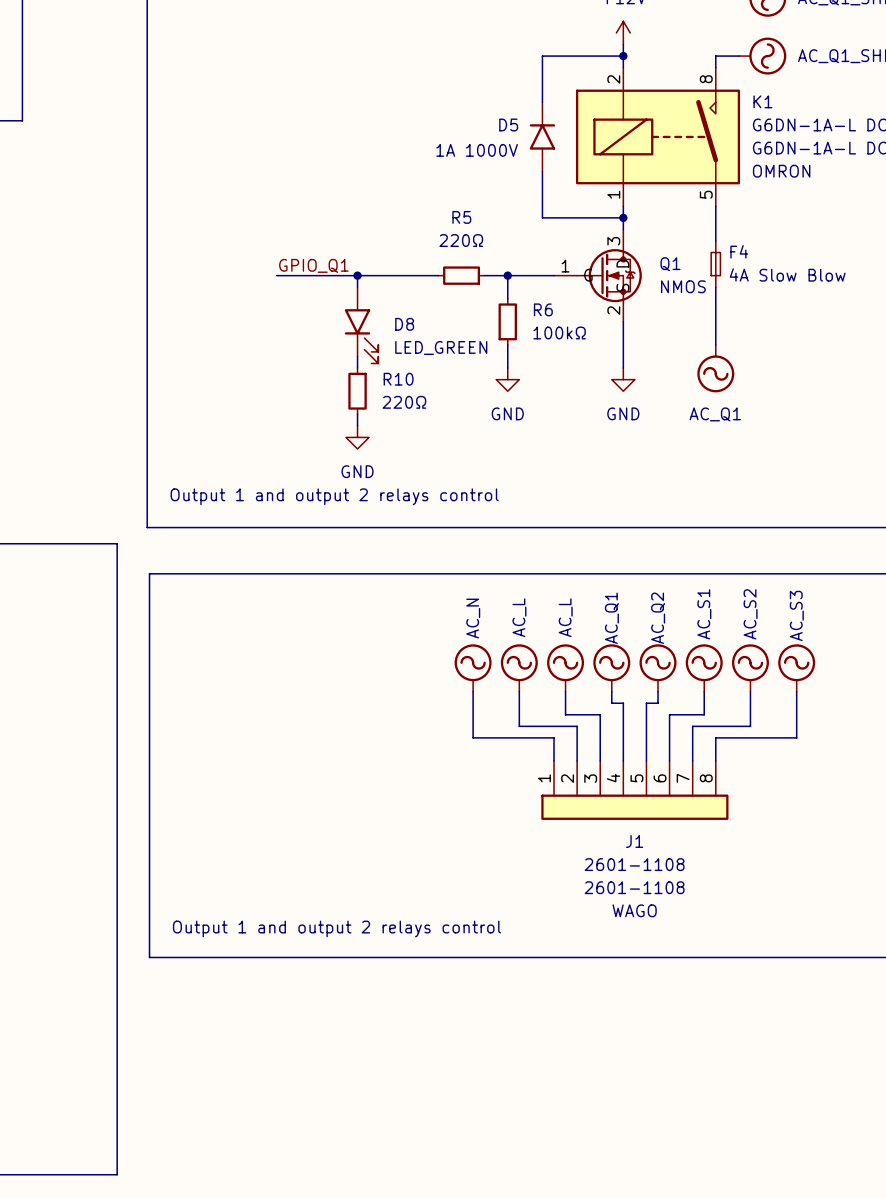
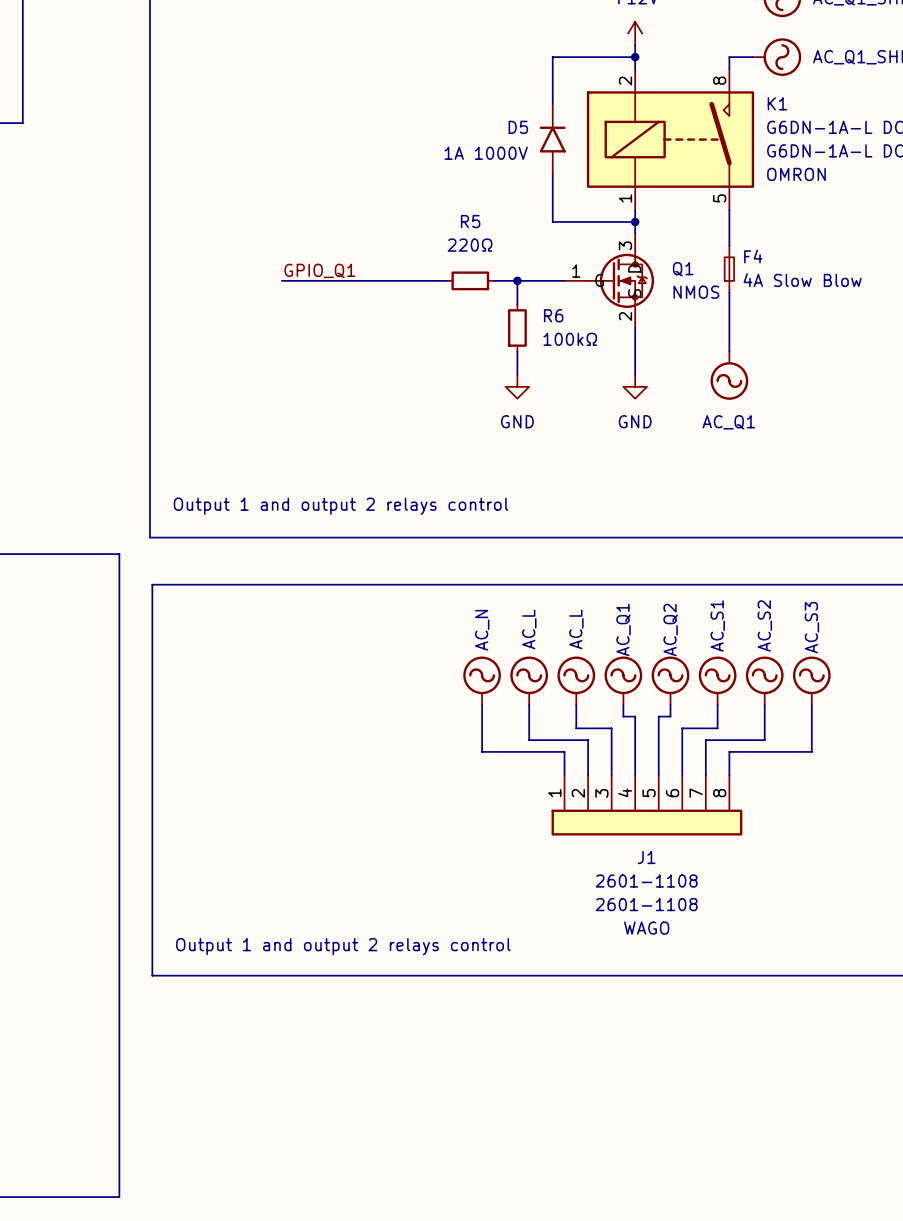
wire: (357, 275) (357, 287) -> none
junction: (357, 275) -> none
D8: (361, 325) -> none
wire: (357, 356) (357, 368) -> none
R10: (357, 391) -> none
wire: (357, 414) (357, 425) -> none
power symbol: GND (357, 437) -> none

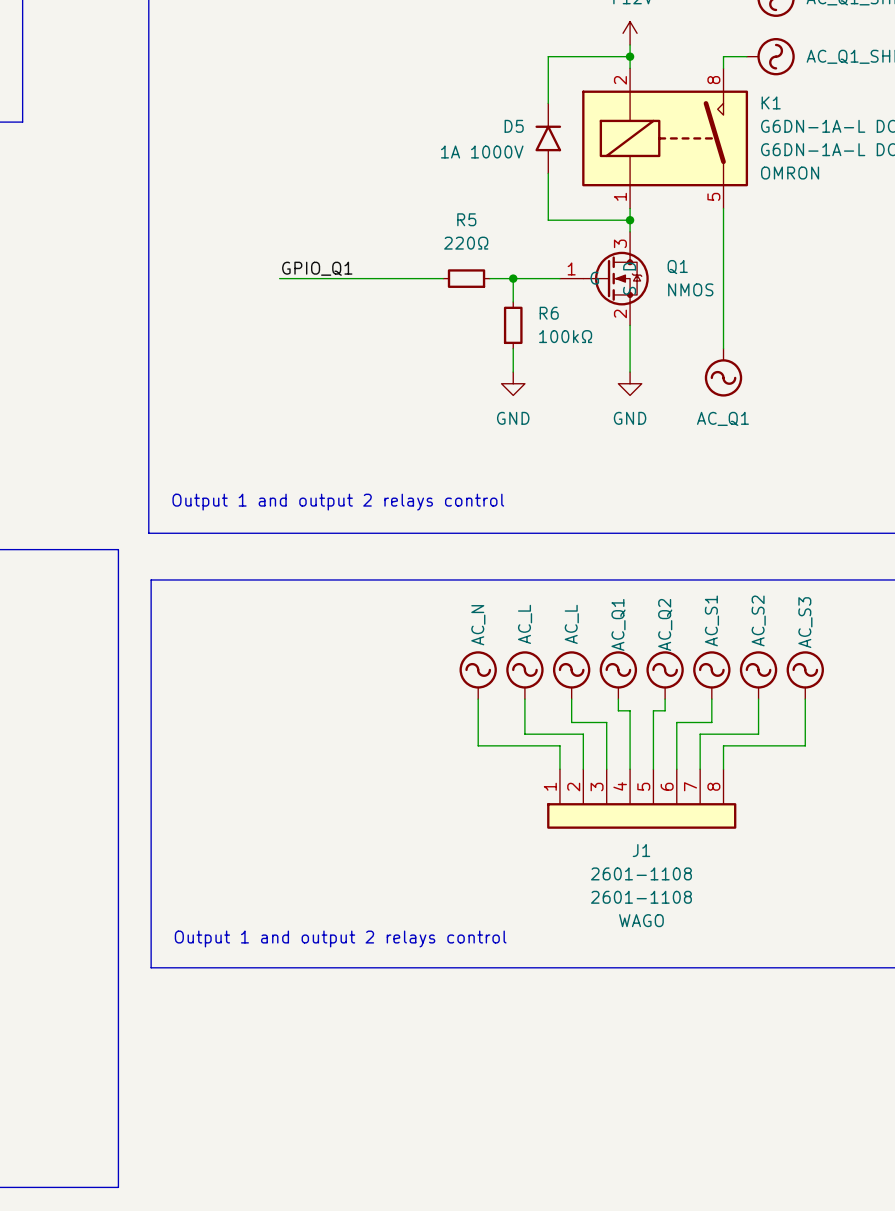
F4: (729, 269) -> none

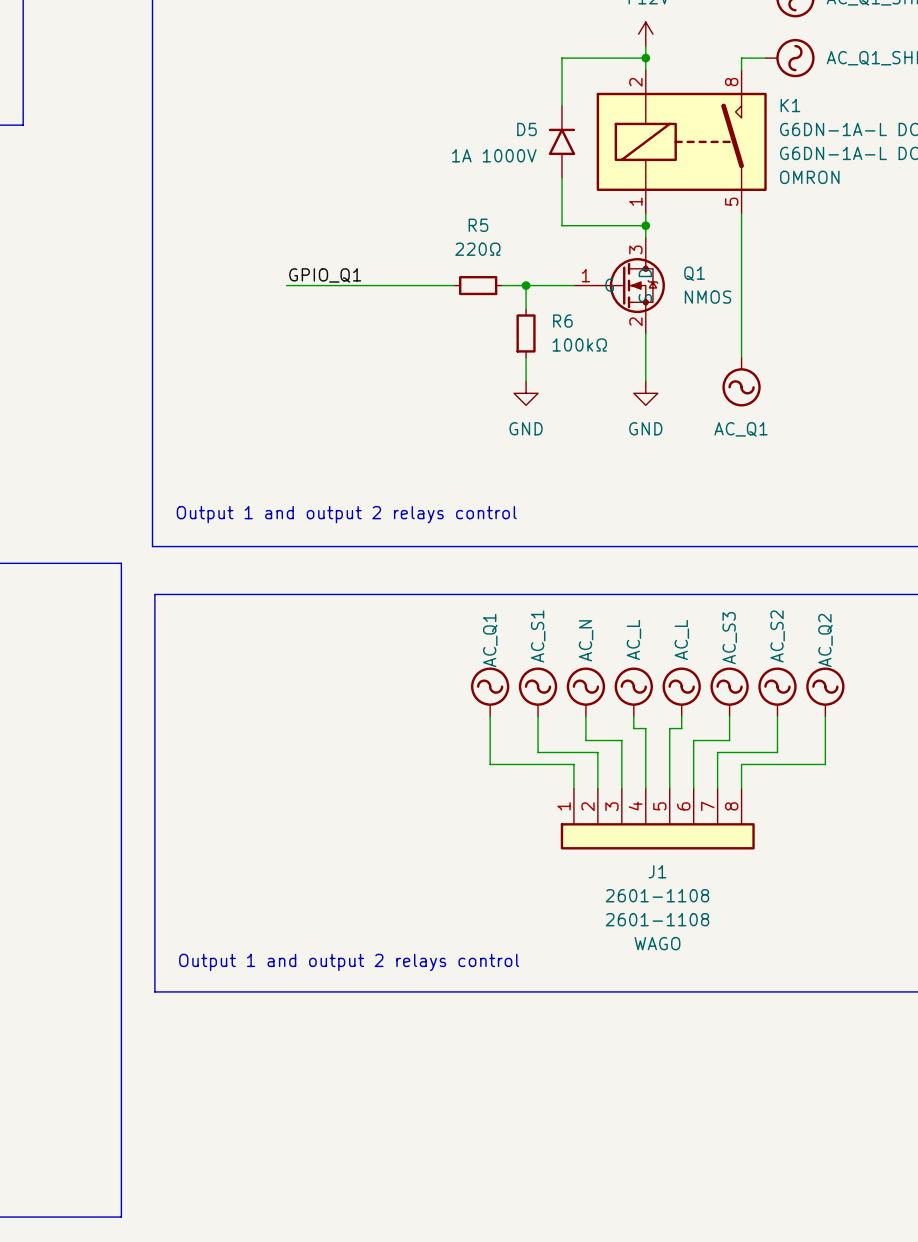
power symbol: AC_N (478, 675) -> AC_Q1 (490, 692)
power symbol: AC_L (524, 675) -> AC_S1 (538, 692)
power symbol: AC_L (571, 675) -> AC_N (585, 692)
power symbol: AC_Q1 (618, 675) -> AC_L (633, 692)
power symbol: AC_Q2 (665, 675) -> AC_L (681, 692)
power symbol: AC_S1 (711, 675) -> AC_S3 (729, 692)
power symbol: AC_S3 (805, 675) -> AC_Q2 (825, 692)

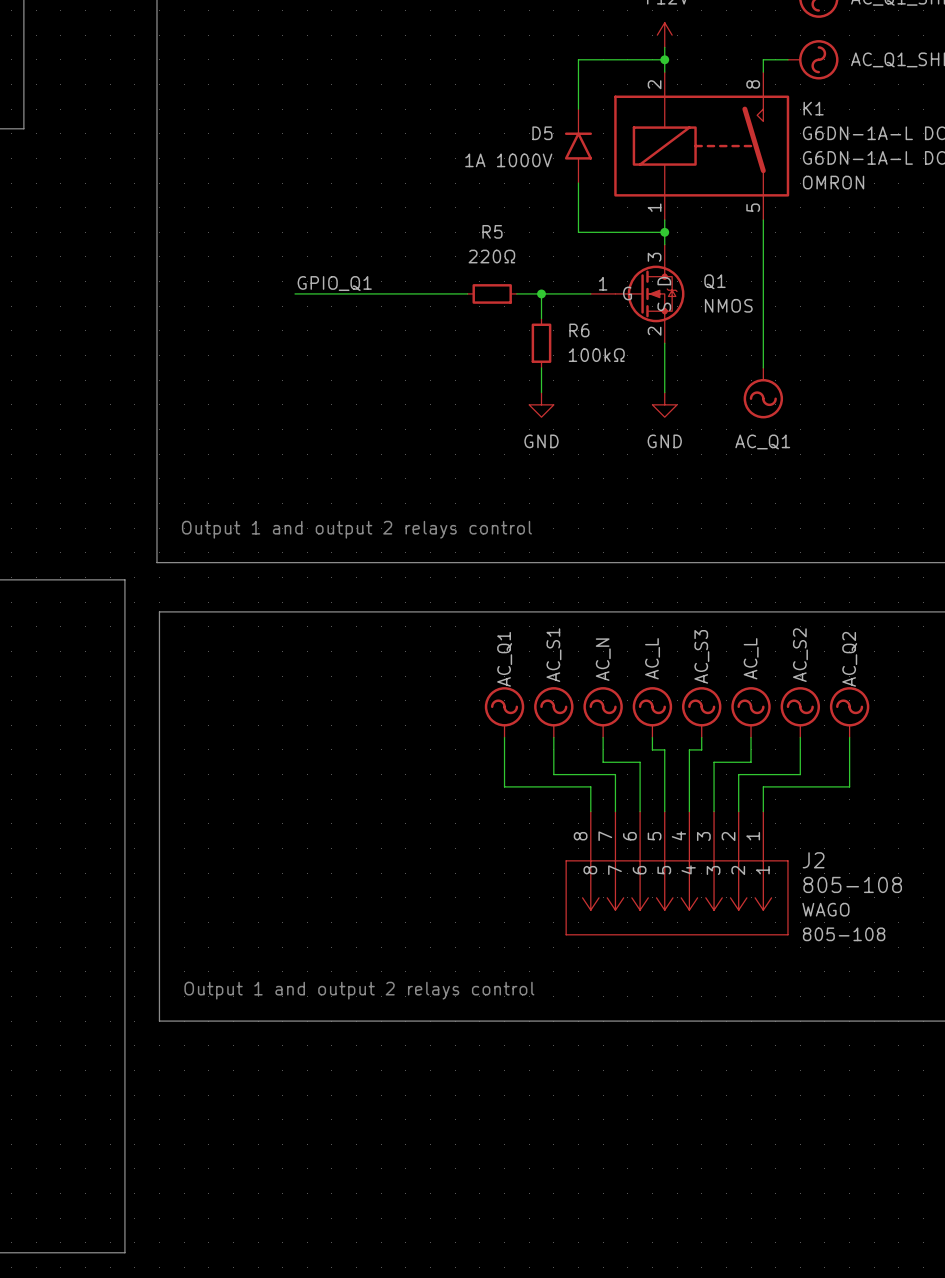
power symbol: AC_L (681, 692) -> AC_S3 (701, 712)
power symbol: AC_S3 (729, 692) -> AC_L (751, 712)
J1: 2601-1108 (657, 818) -> none
J2: none -> 805-108 (677, 873)

